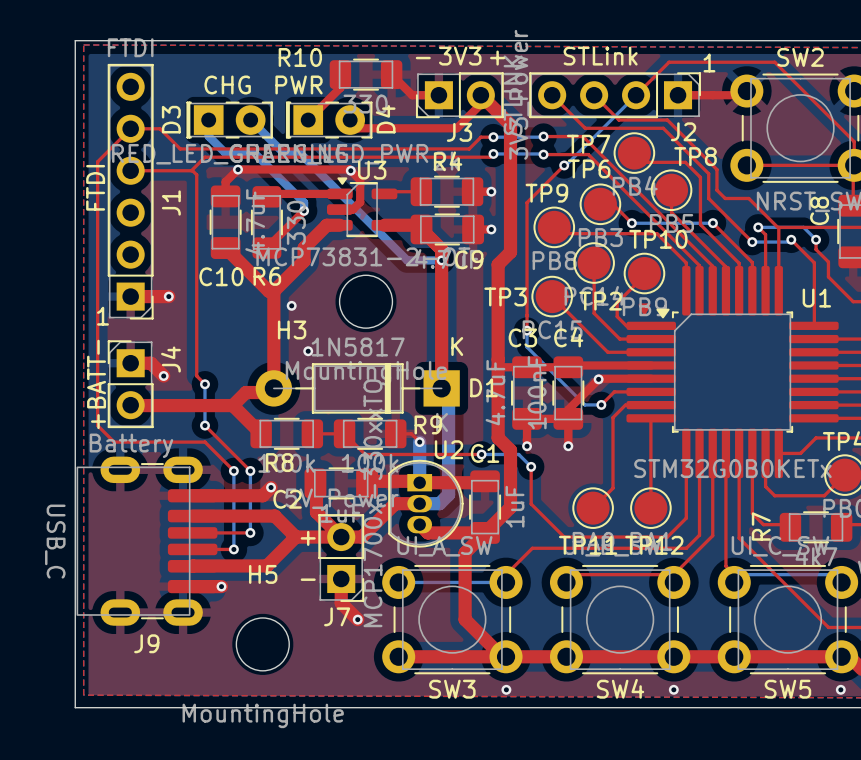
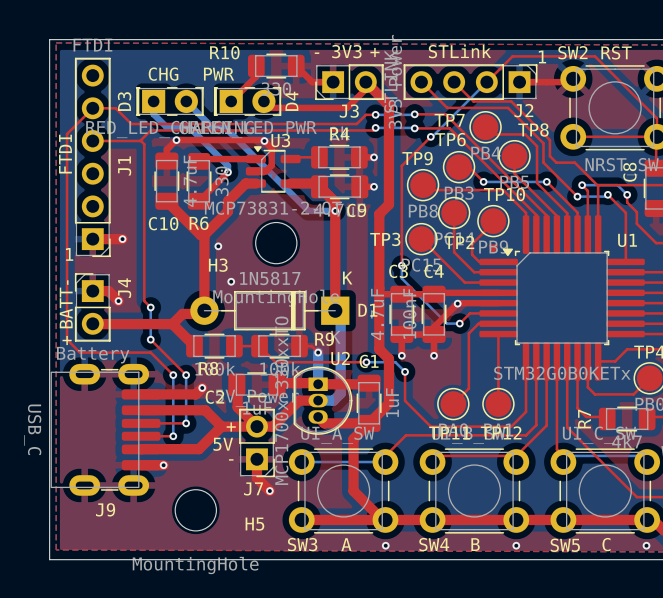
SW2 name position: SW2 (800, 57) -> SW2 (572, 52)
text: none -> RST (616, 52)
text: none -> 5V (223, 444)
H5 name position: H5 (263, 574) -> H5 (254, 524)
text: none -> A (346, 544)
SW4 name position: SW4 (620, 688) -> SW4 (434, 544)
text: none -> B (475, 544)
text: none -> C (606, 544)
SW3 name position: SW3 (452, 689) -> SW3 (302, 544)
SW5 name position: SW5 (787, 689) -> SW5 (565, 545)

